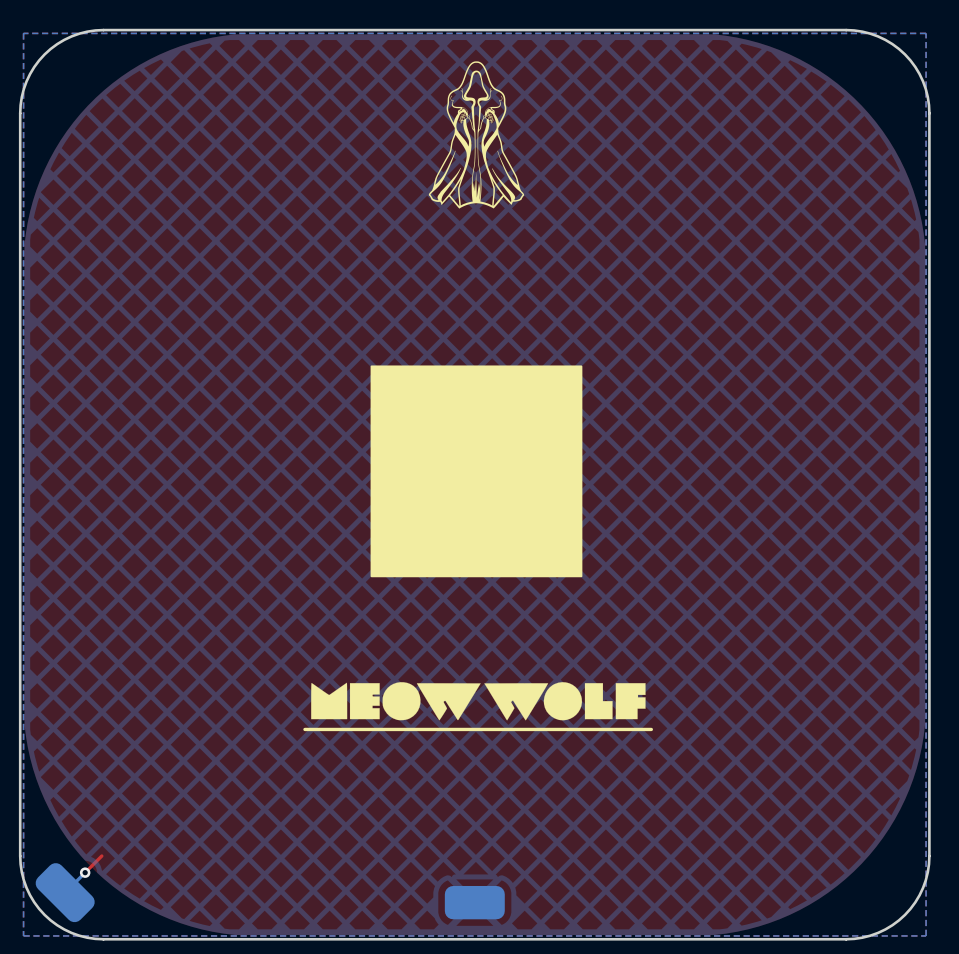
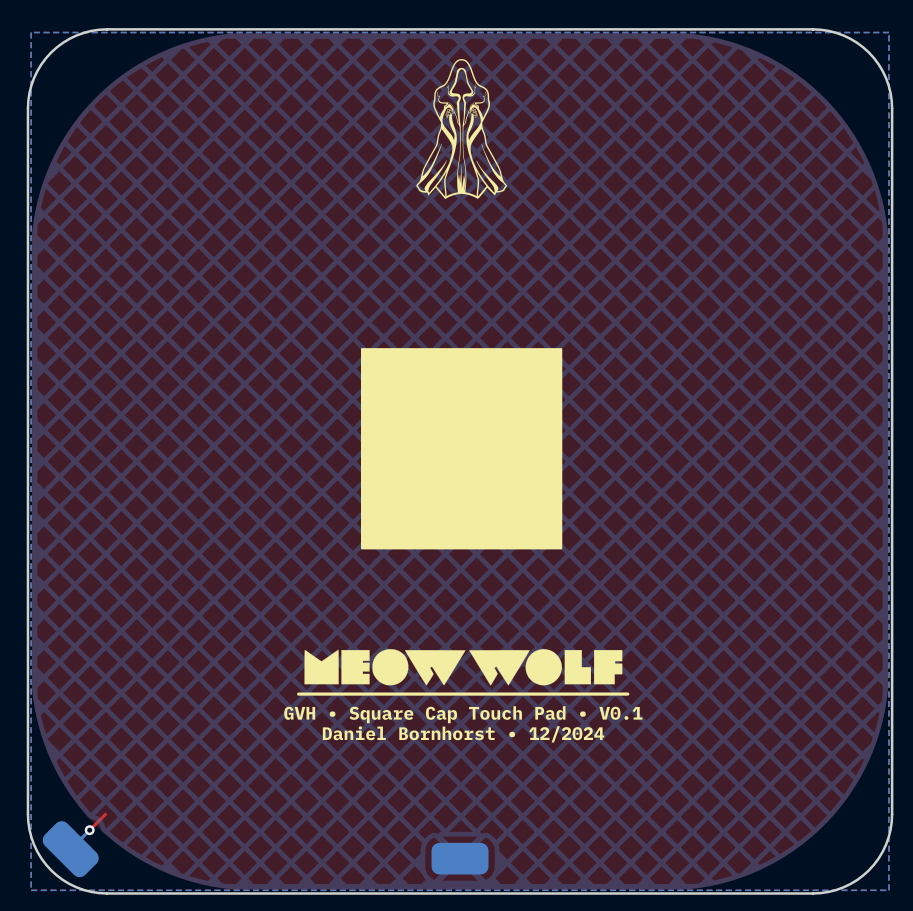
text: none -> GVH • Square Cap Touch Pad • V0.1 (463, 714)
text: none -> Daniel Bornhorst • 12/2024 (463, 734)

